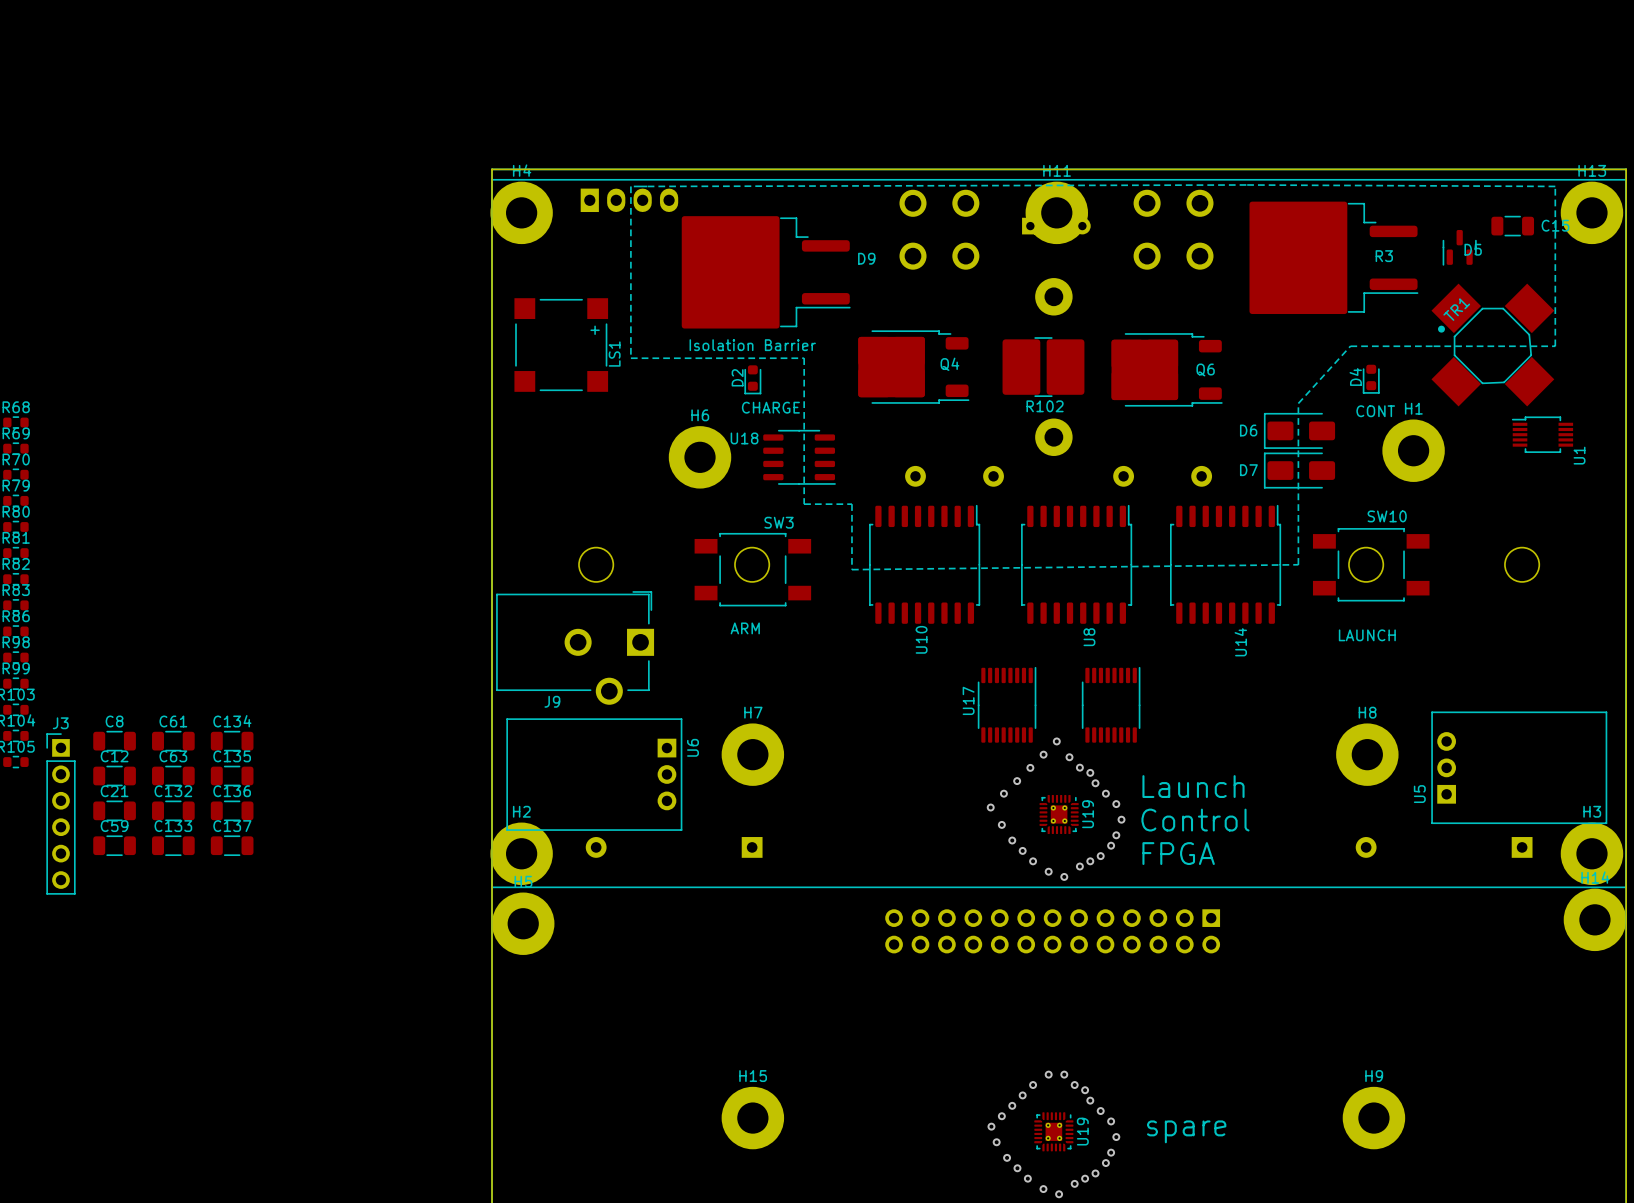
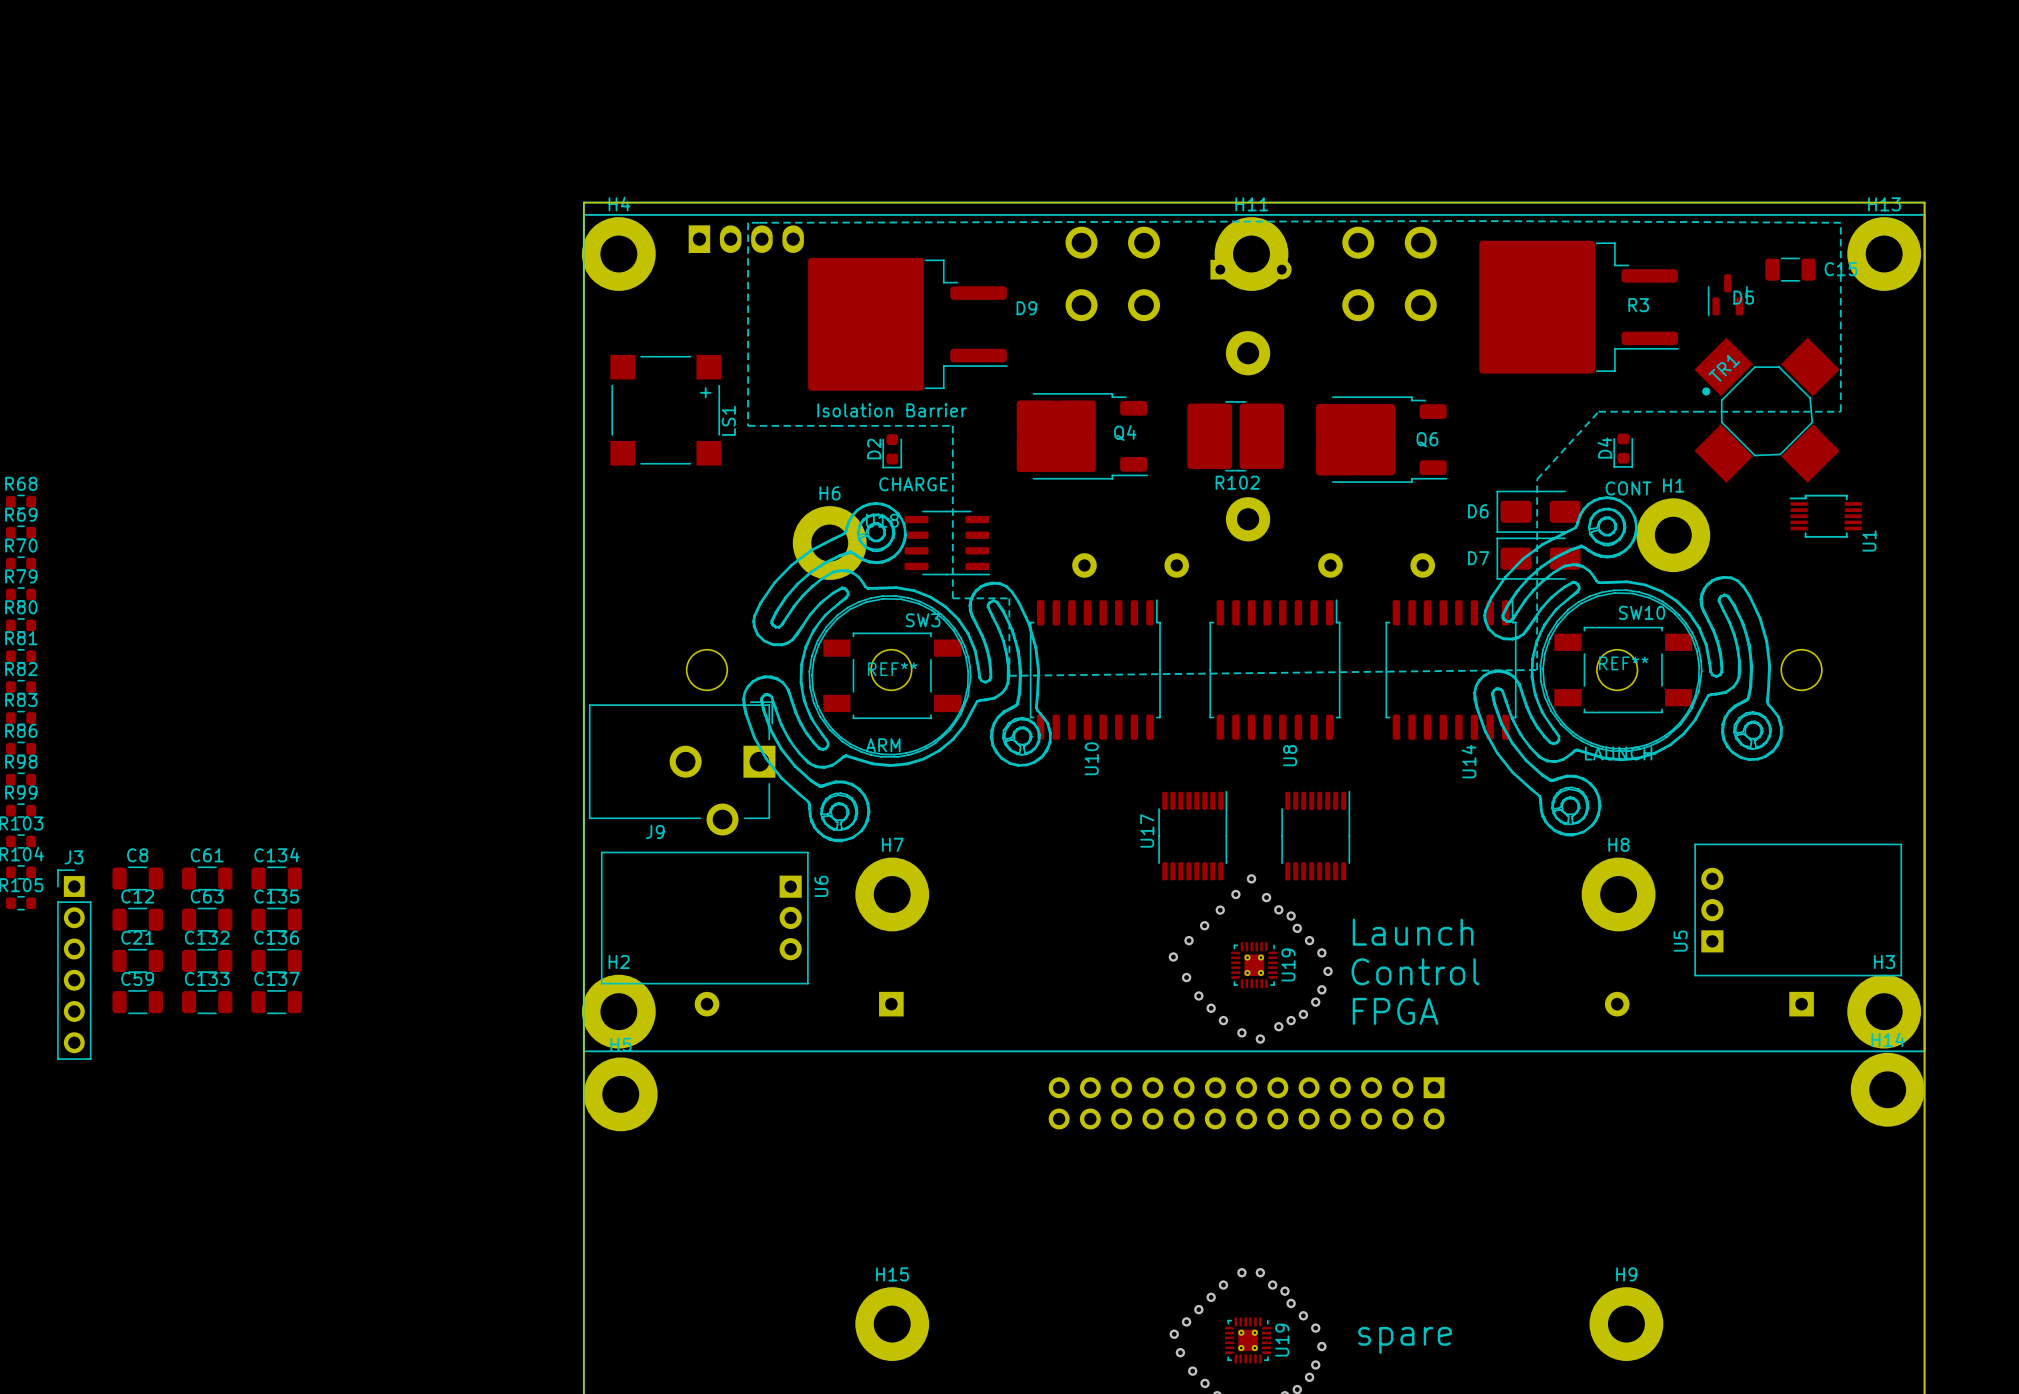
REF**: none -> (1628, 666)
REF**: none -> (897, 672)

